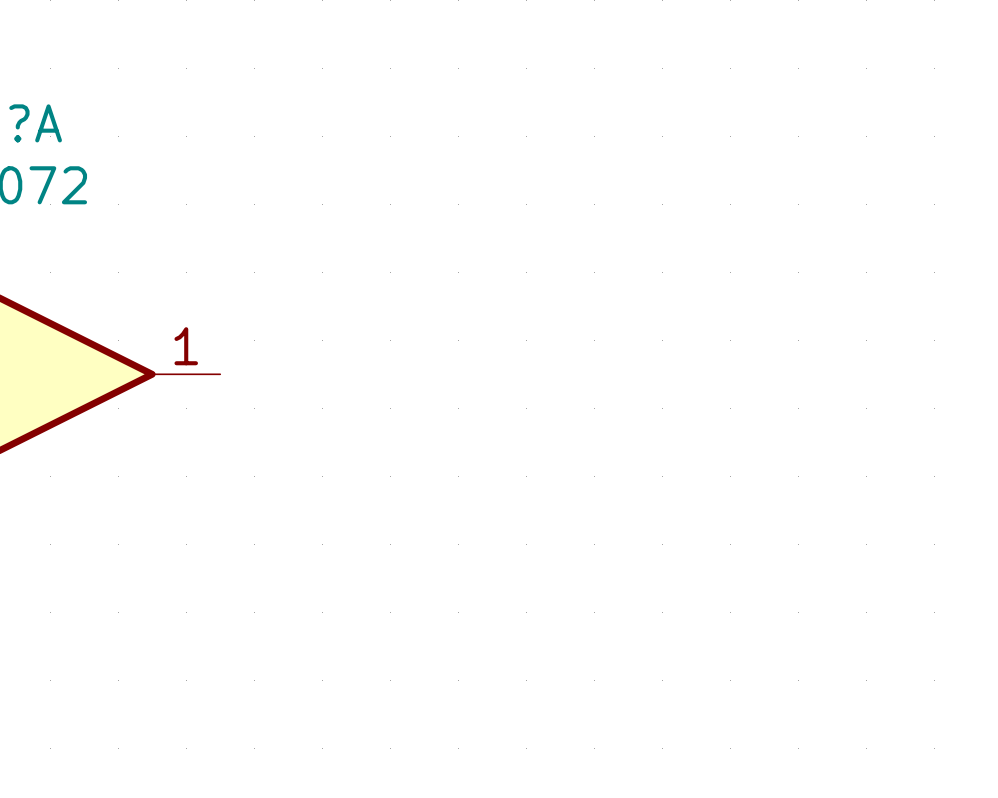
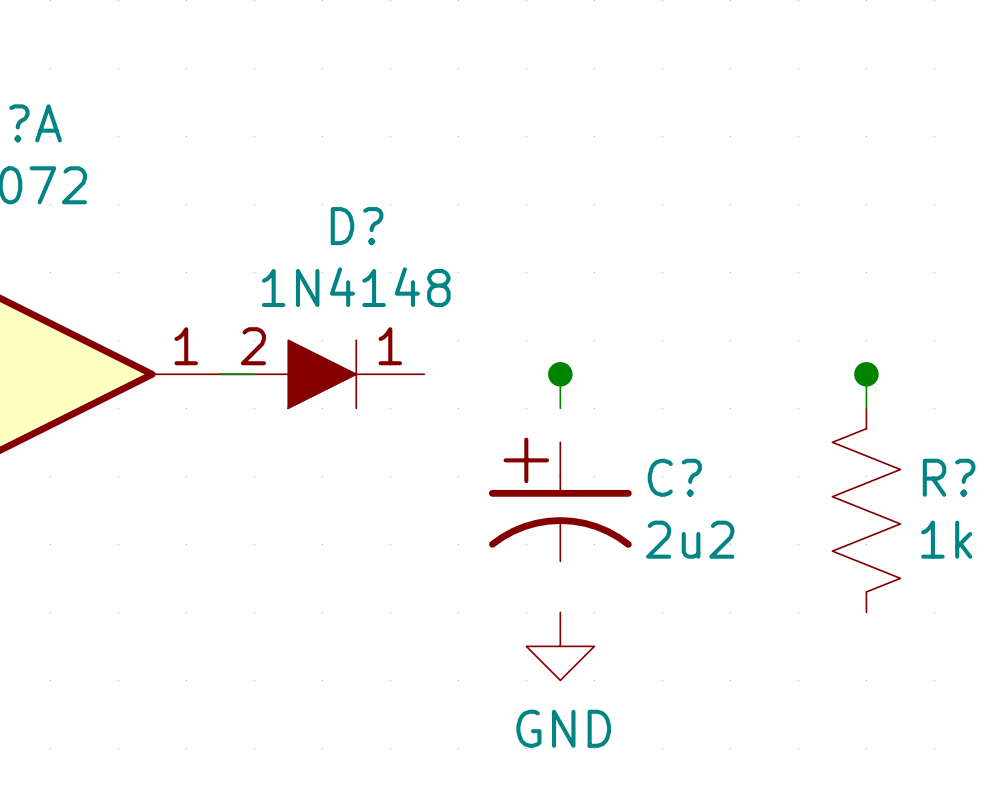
wire: none -> (220, 374) (254, 374)
D?: none -> 1N4148 (322, 374)
wire: none -> (560, 374) (560, 408)
junction: none -> (560, 374)
wire: none -> (866, 374) (866, 408)
junction: none -> (866, 374)
C?: none -> 2u2 (560, 501)
R?: none -> 1k (866, 510)
power symbol: none -> GND (560, 646)

